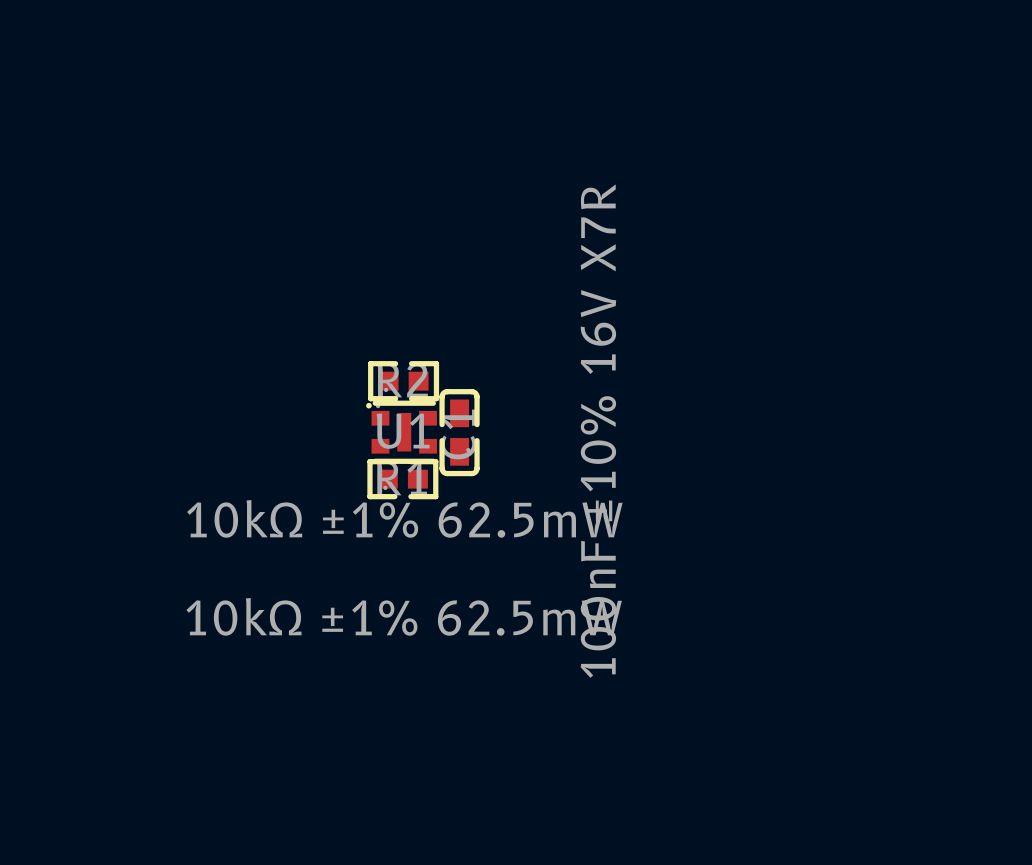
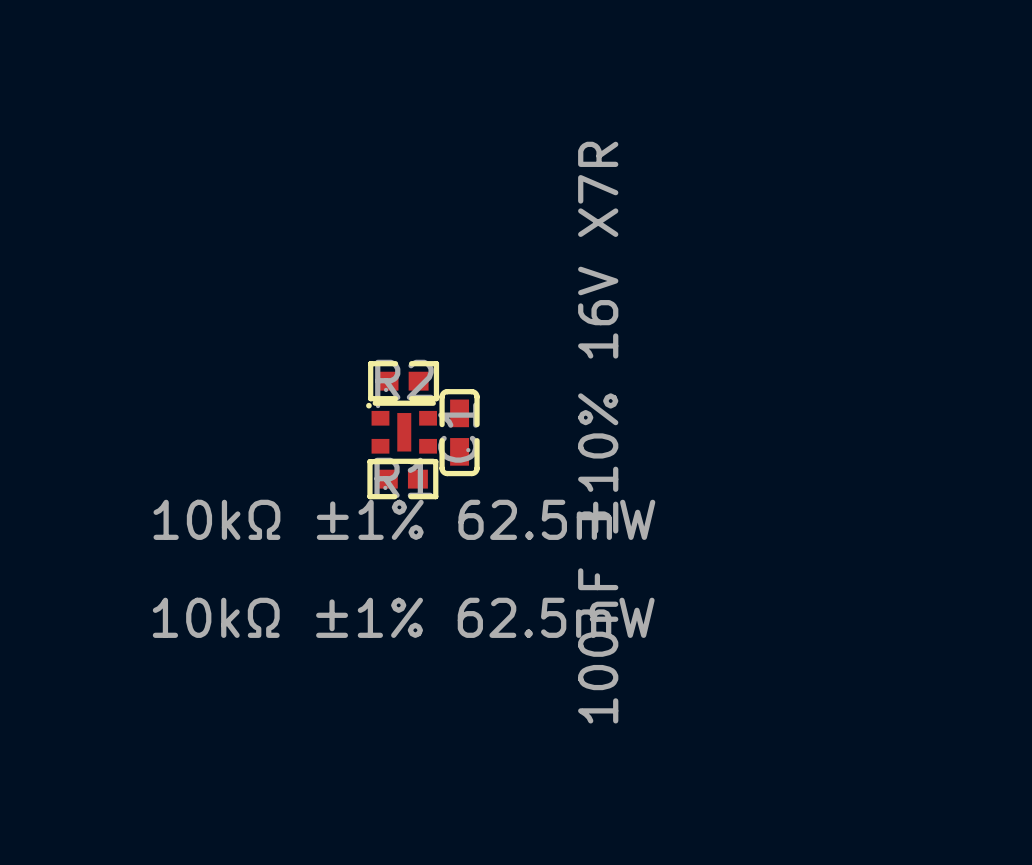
U1 name: U1 (403, 431) -> none

